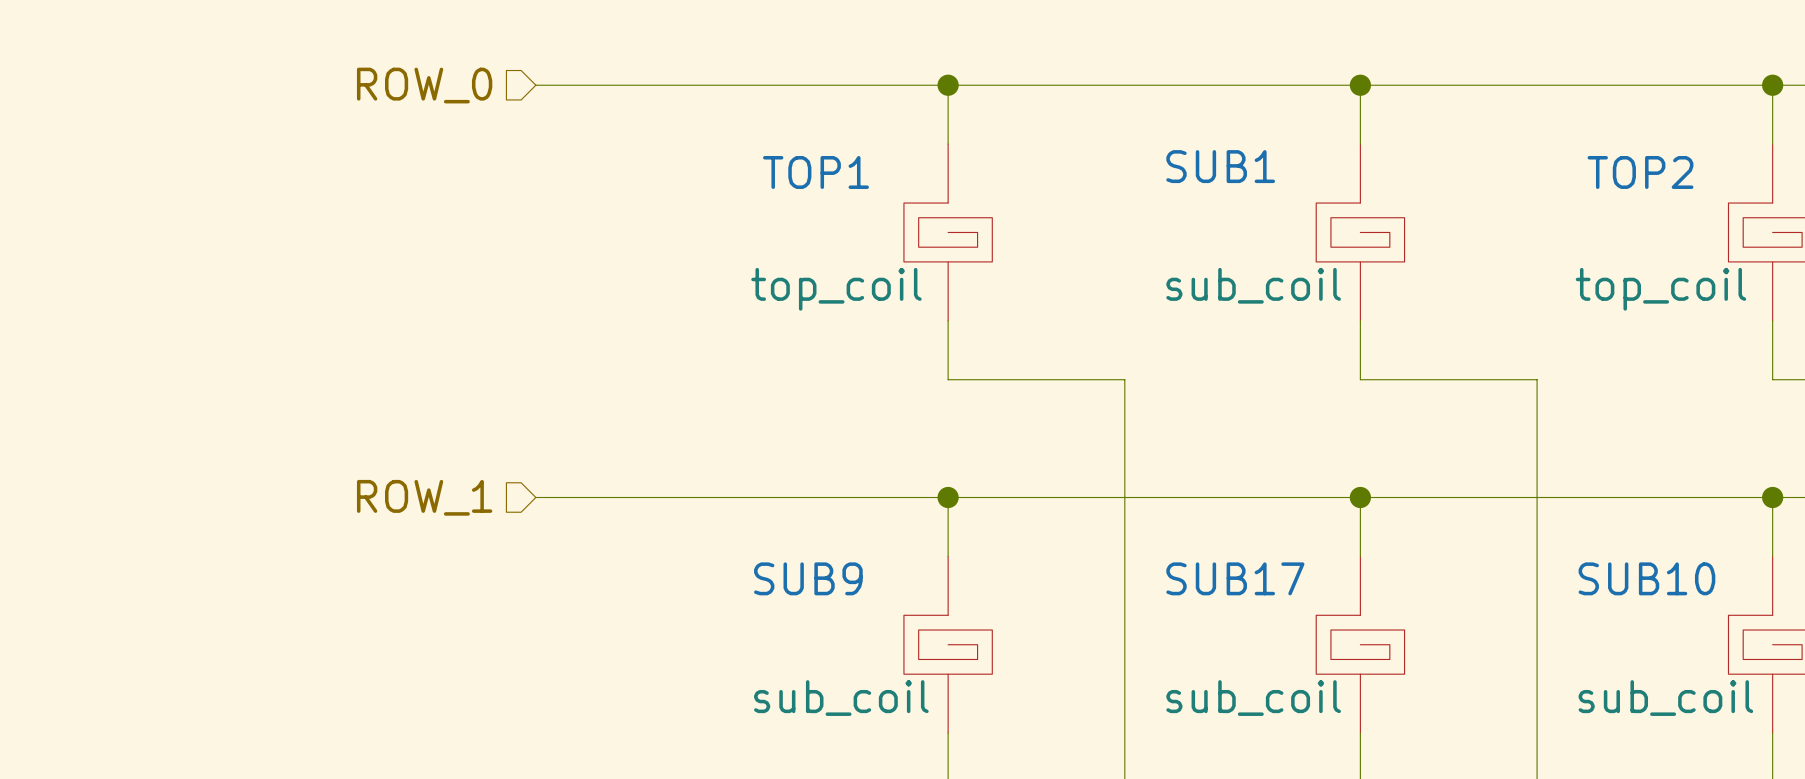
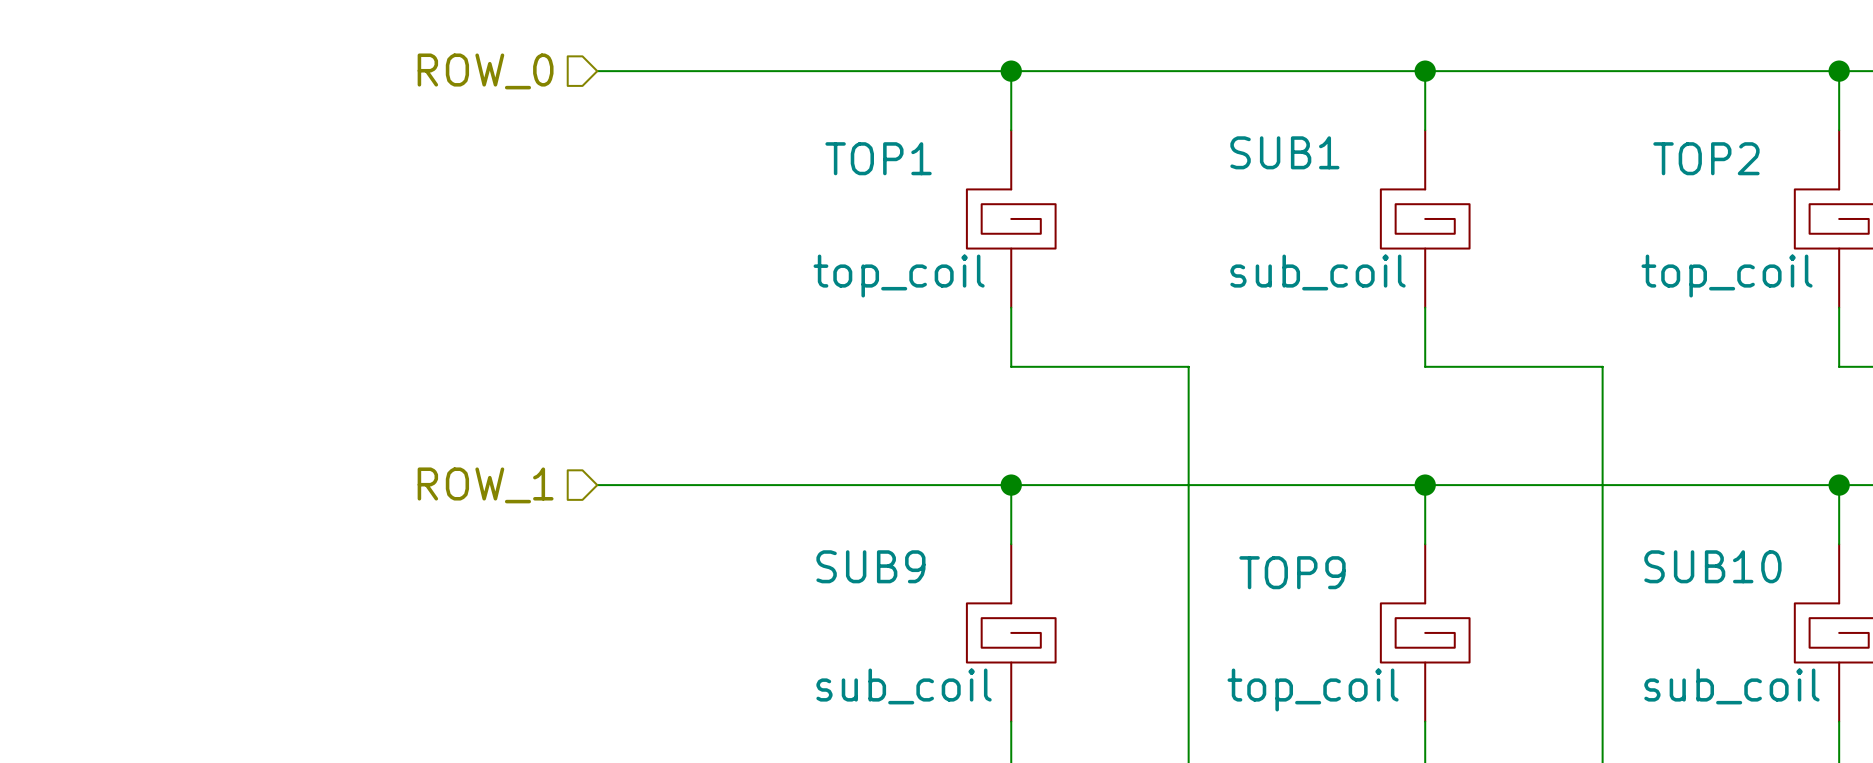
SUB17 name: SUB17 (1235, 578) -> TOP9 (1292, 572)
SUB17 value: sub_coil (1253, 698) -> top_coil (1313, 689)

